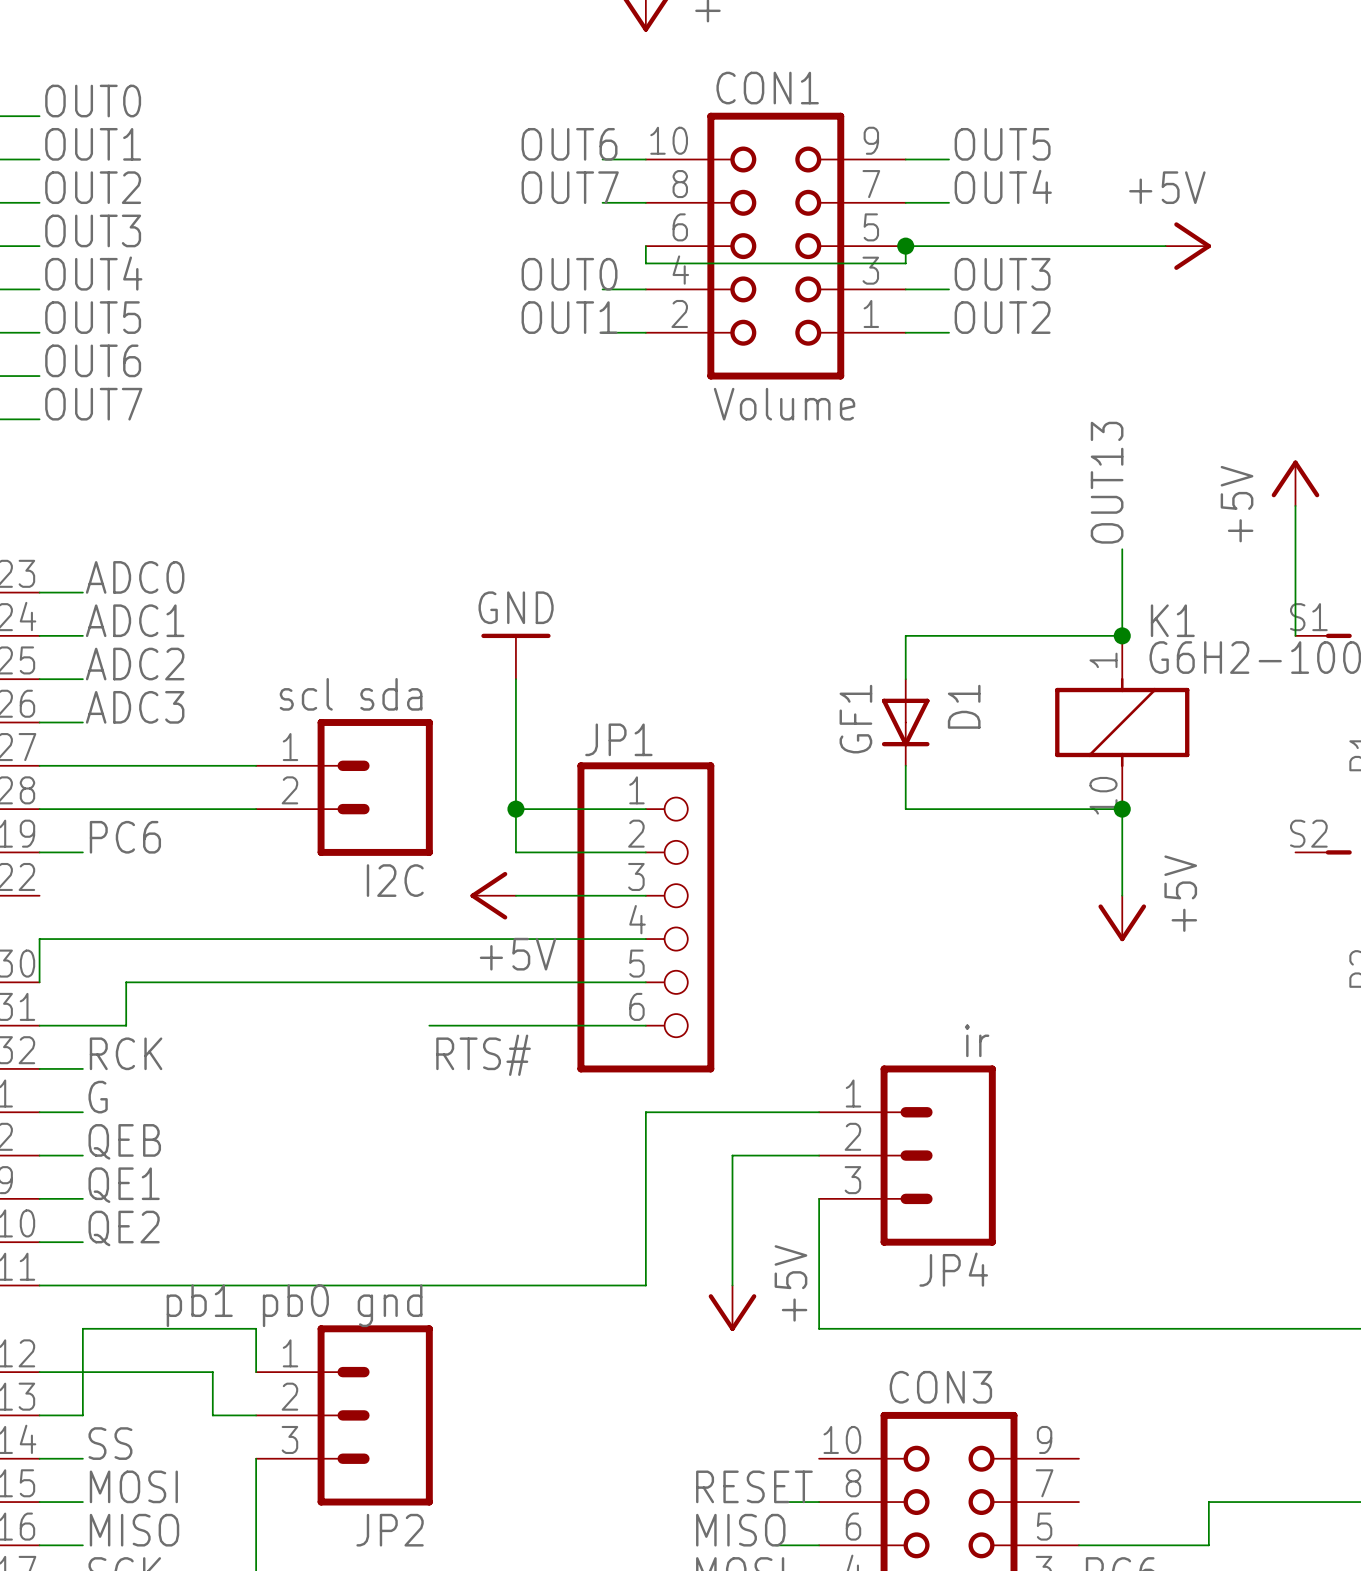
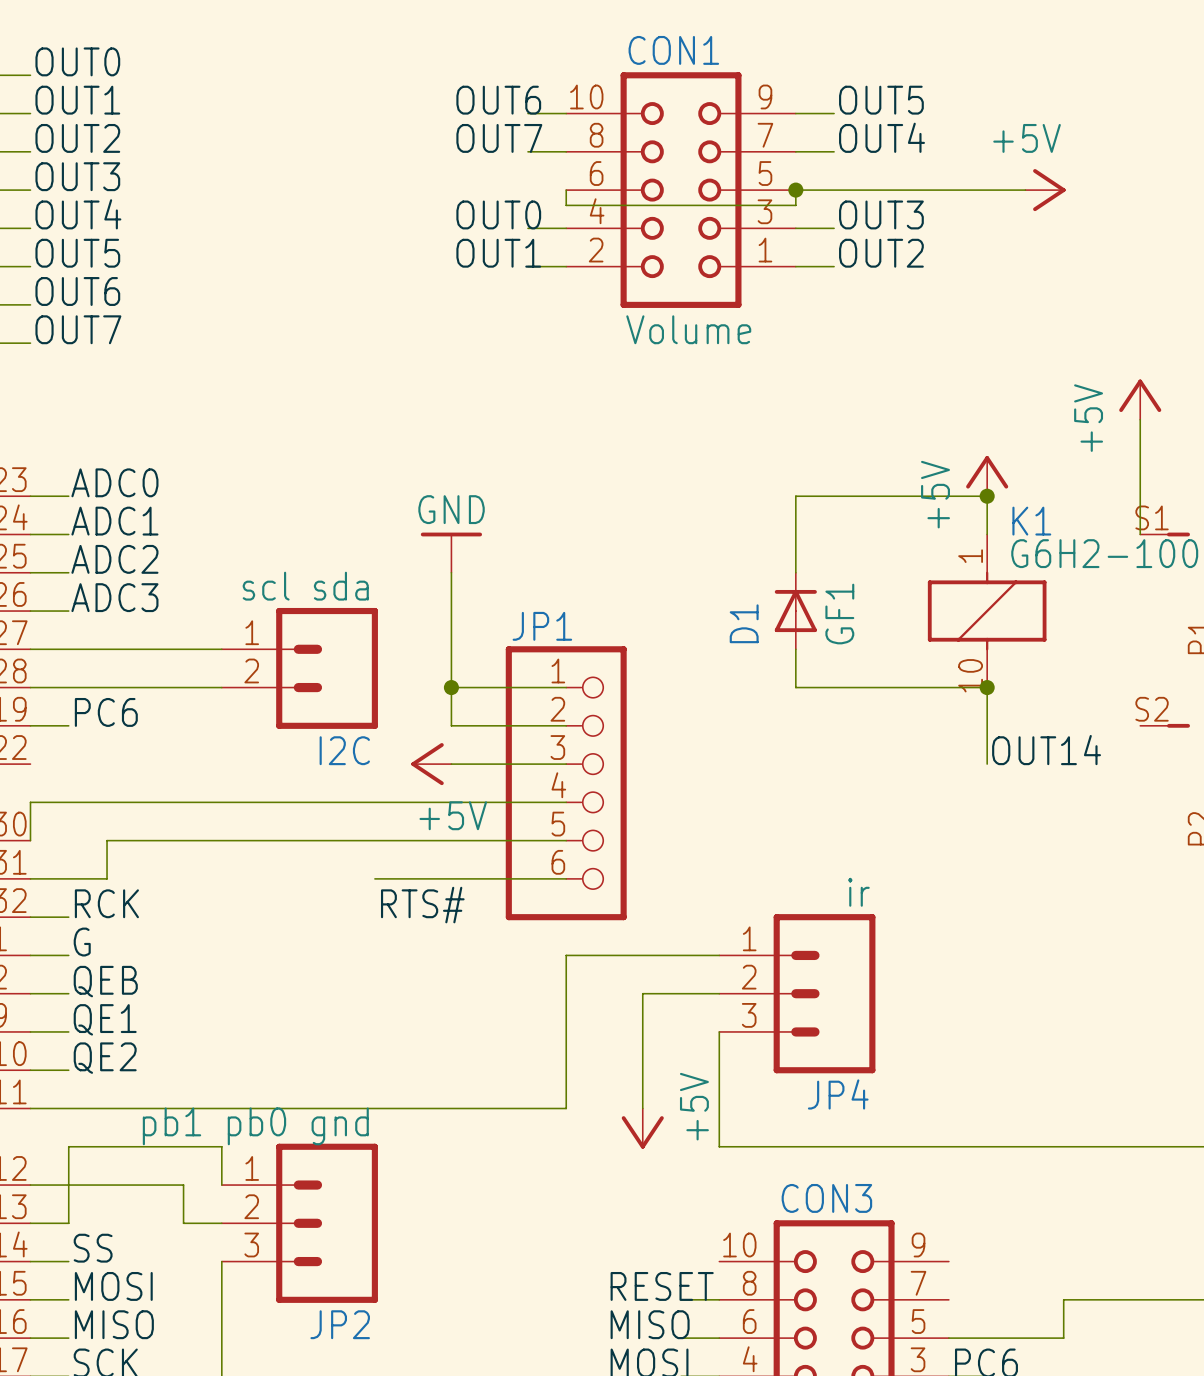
label: OUT13 (1107, 482) -> none
wire: (905, 635) (1122, 635) -> (795, 534) (795, 496) (987, 496)
junction position: (1122, 635) -> (987, 496)
D1 rotation: 0° (905, 722) -> 180° (795, 611)
label: none -> OUT14 (1046, 750)
power symbol position: +5V (1122, 918) -> +5V (987, 476)
power symbol rotation: 0° (1122, 922) -> 180° (987, 472)

